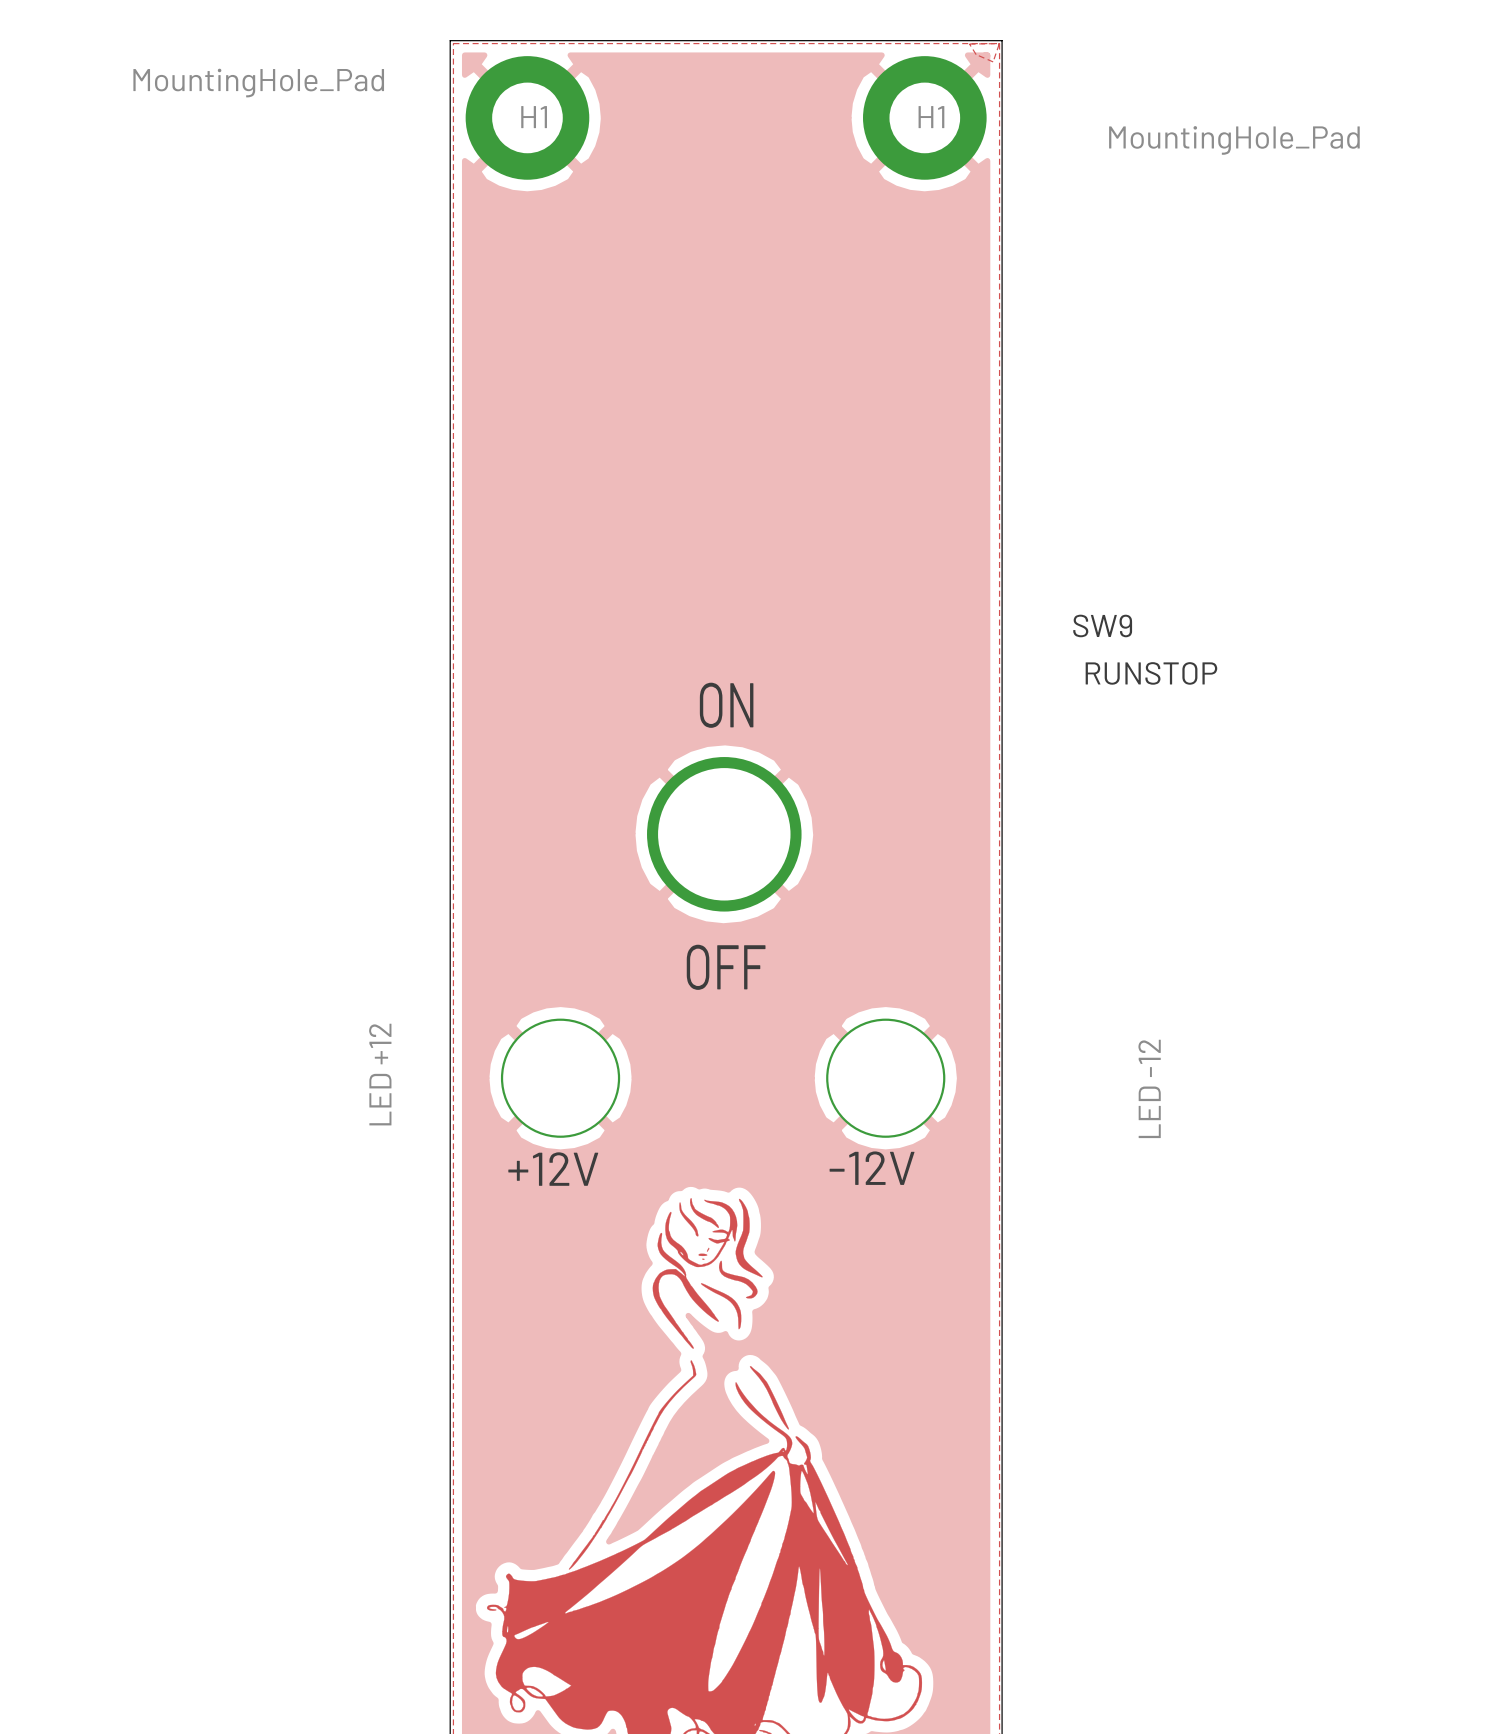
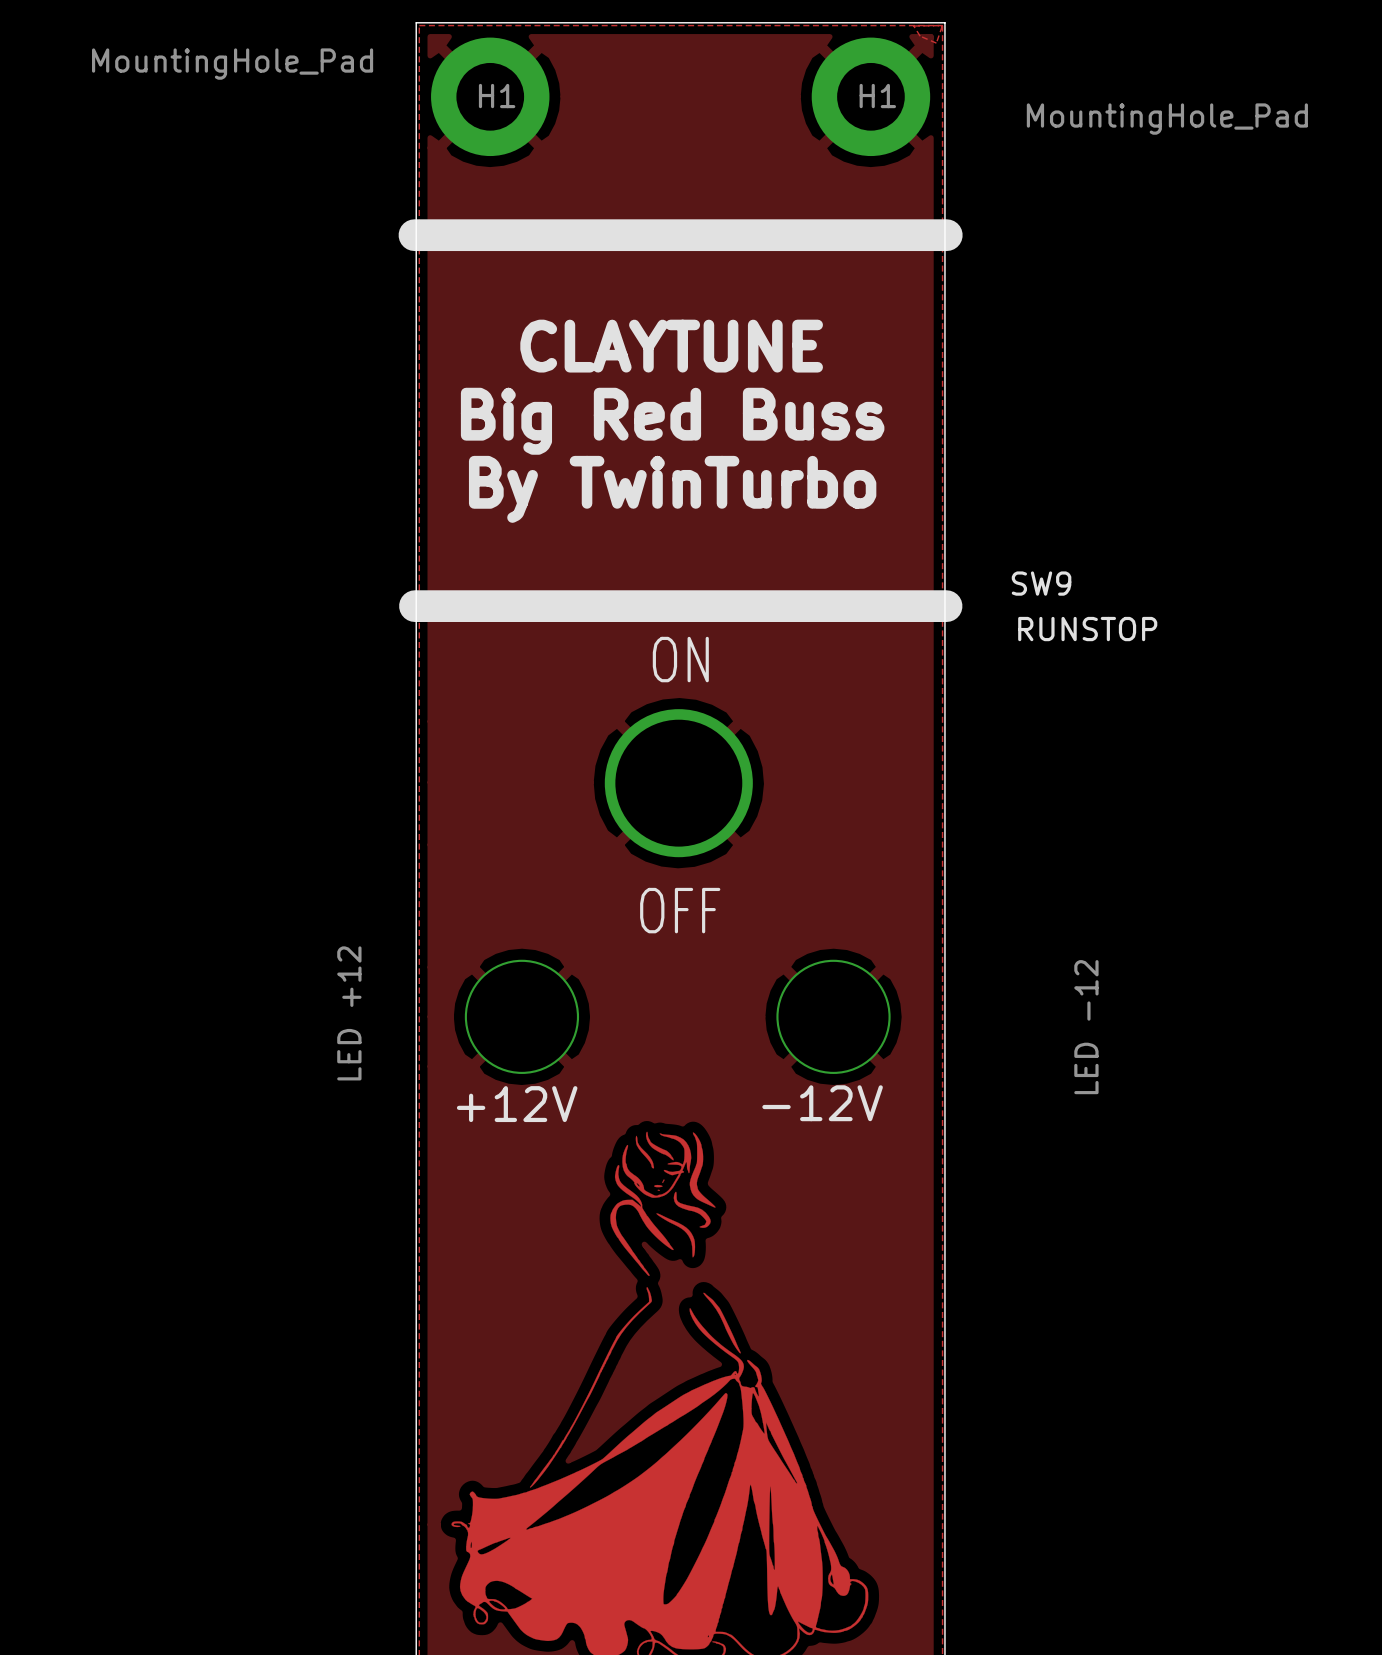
line: none -> (414, 235) (946, 235)
text: none -> CLAYTUNE (671, 346)
text: none -> Big Red Buss (672, 421)
text: none -> By TwinTurbo (672, 489)
line: none -> (414, 606) (946, 606)

